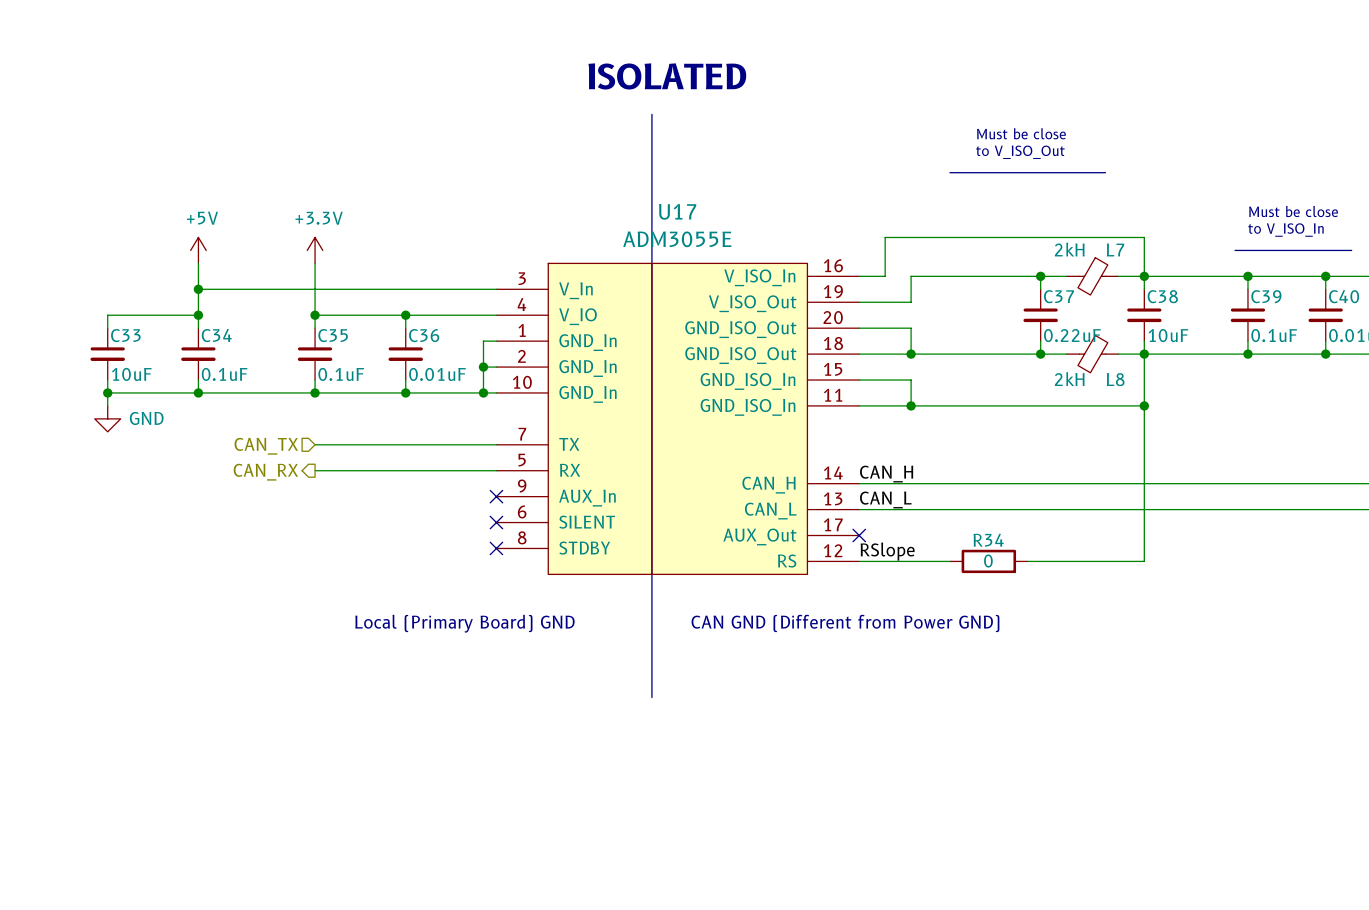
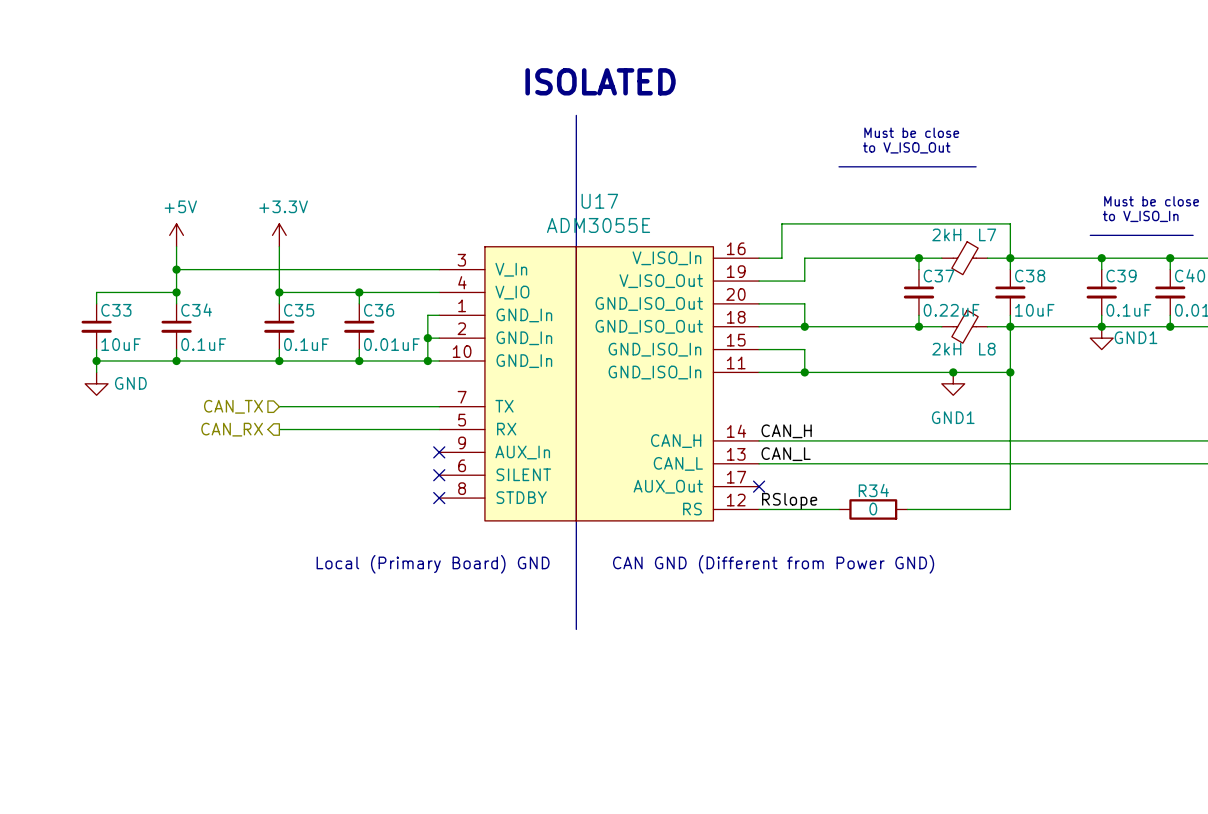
power symbol: none -> GND1 (1101, 338)
junction: none -> (953, 372)
power symbol: none -> GND1 (953, 383)

